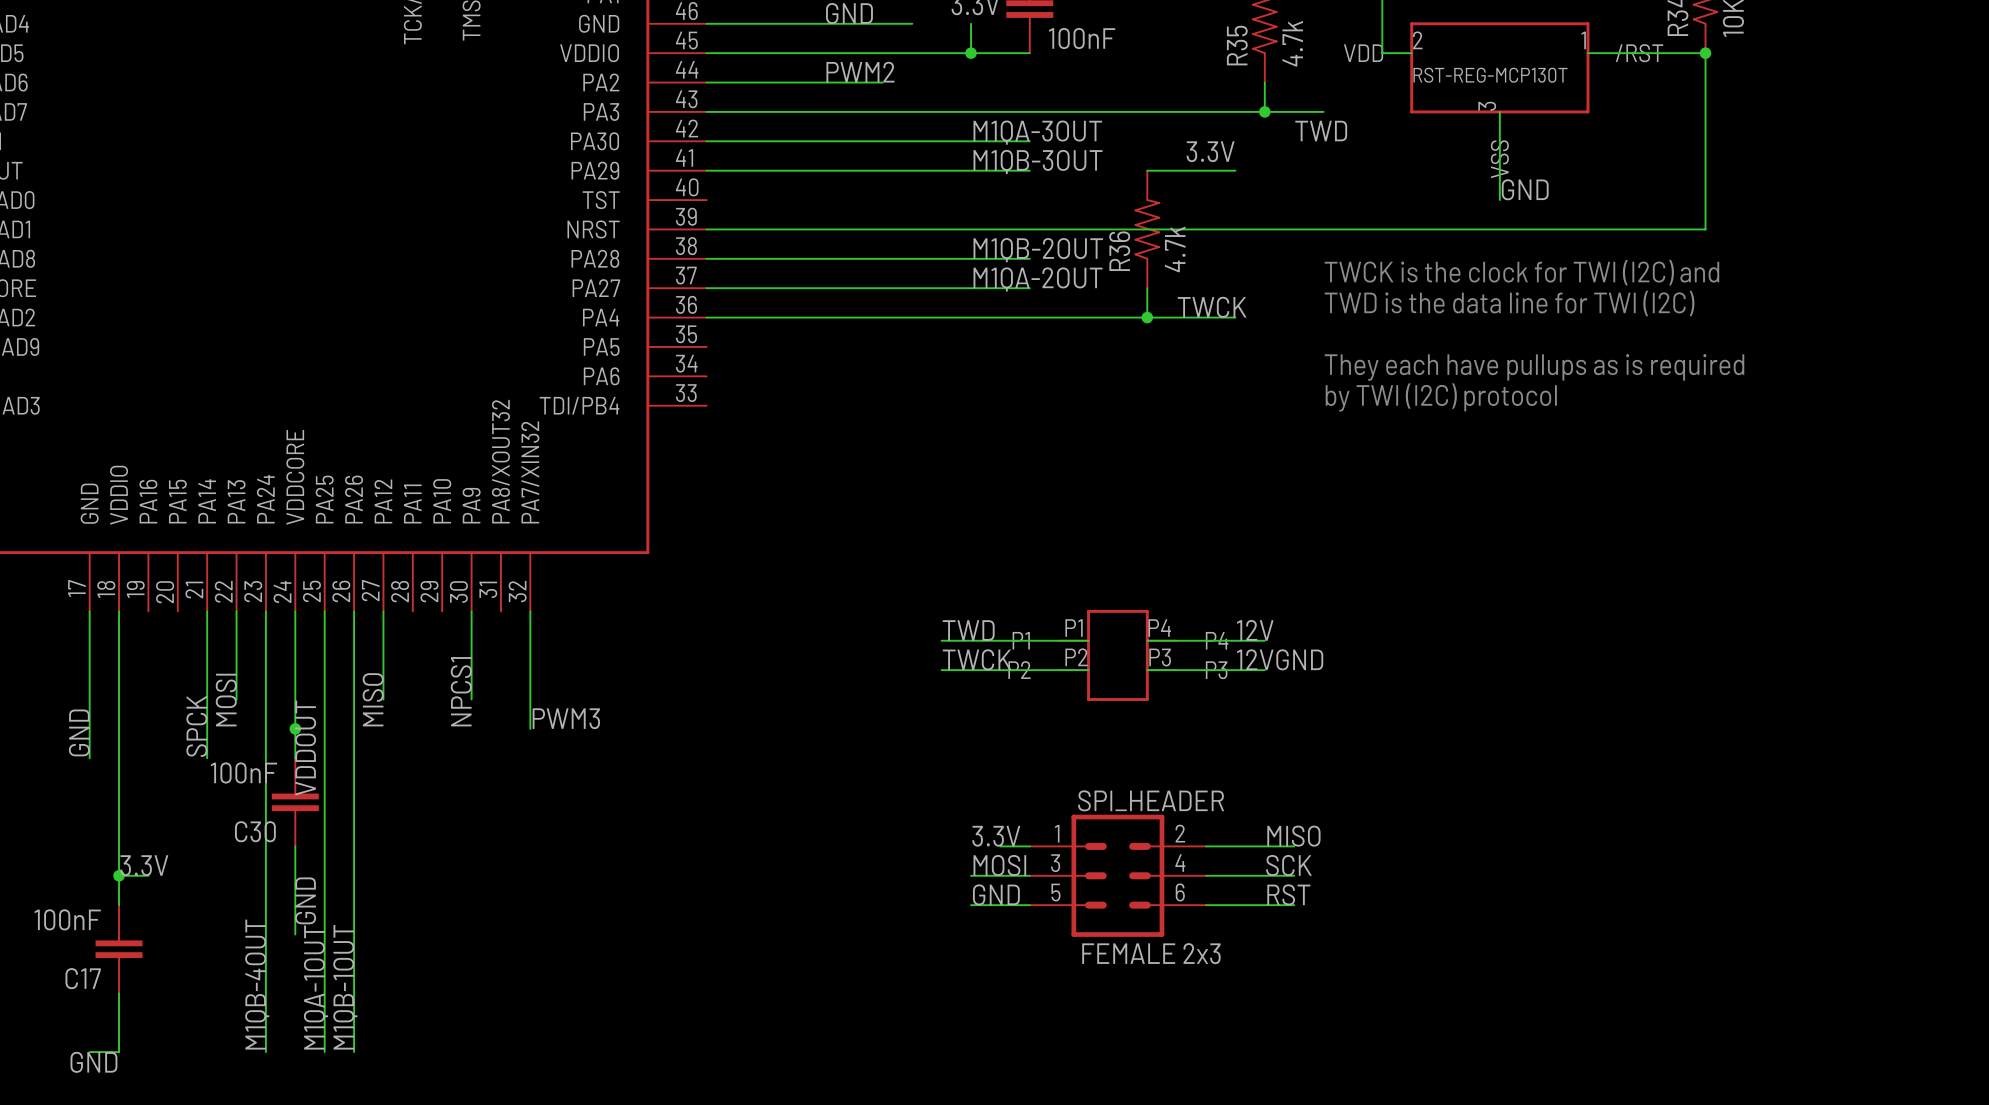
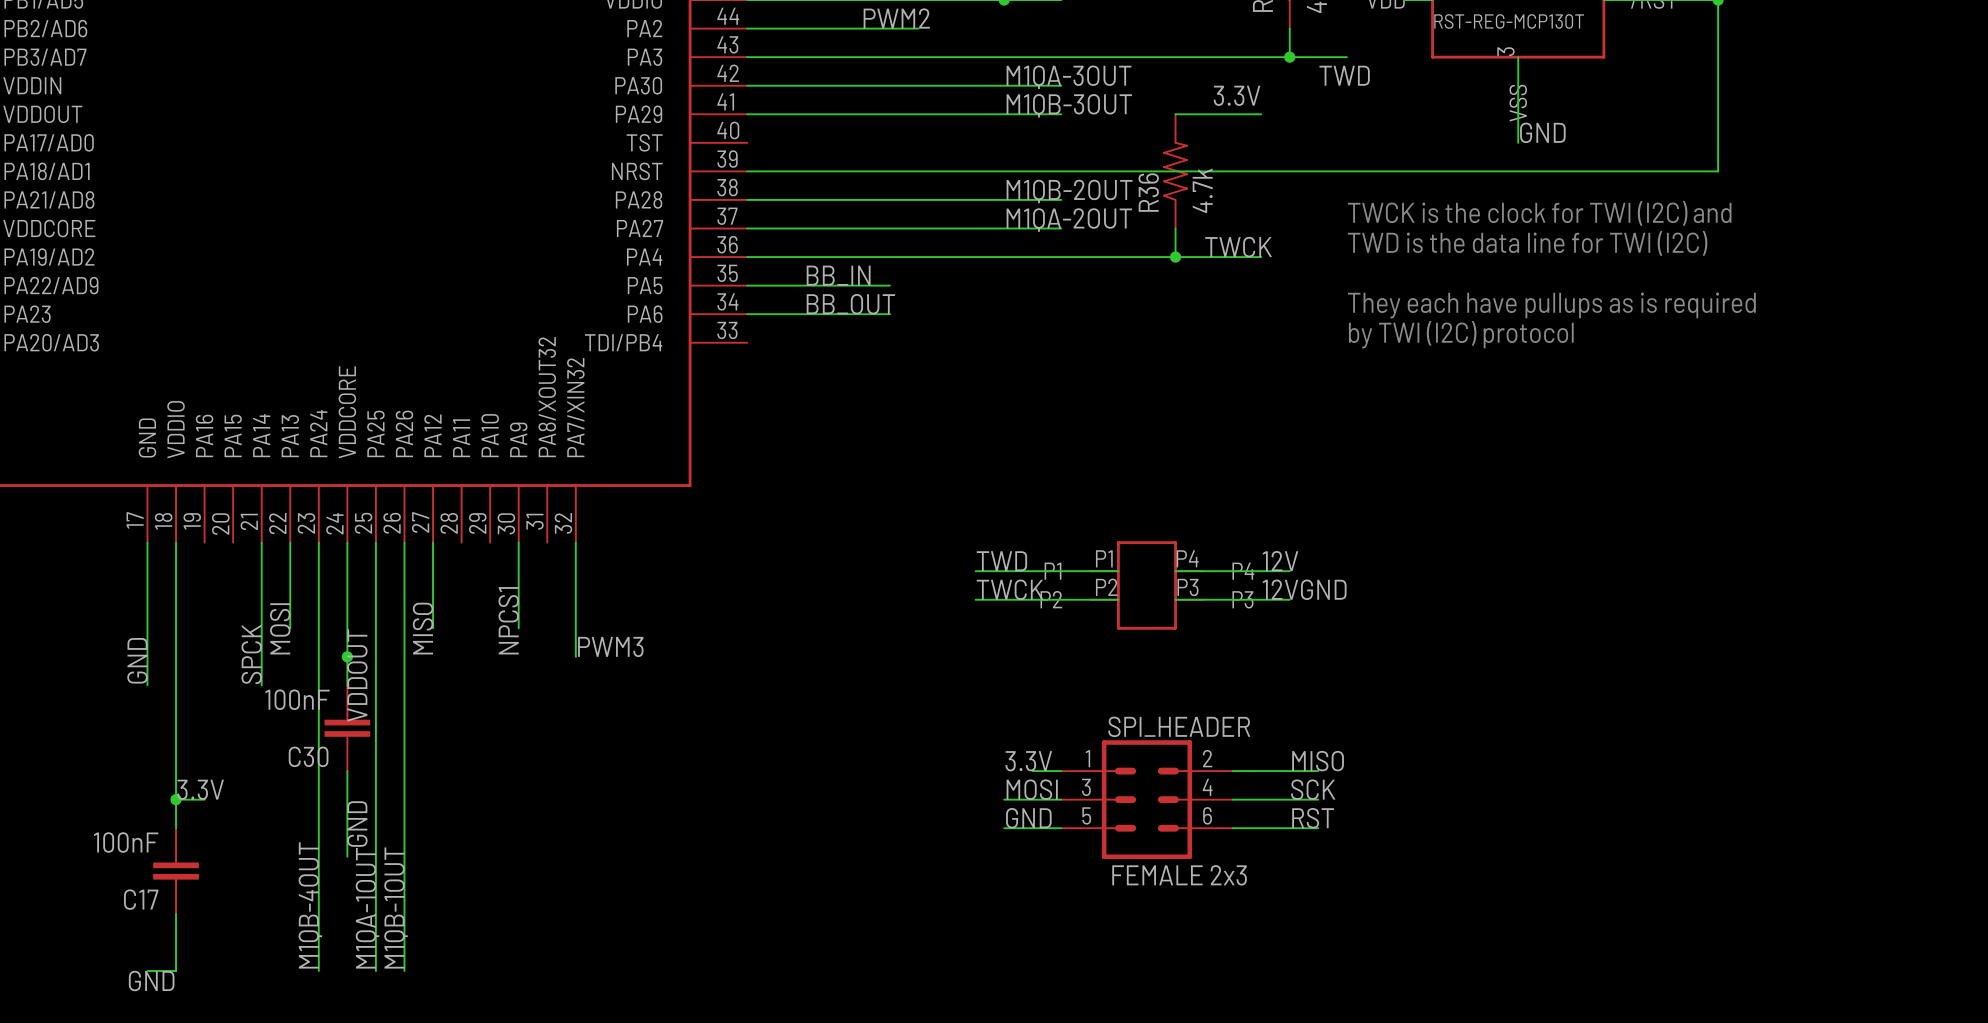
label: none -> BB_IN (838, 275)
wire: none -> (747, 285) (889, 285)
label: none -> BB_OUT (850, 304)
wire: none -> (747, 314) (889, 314)

